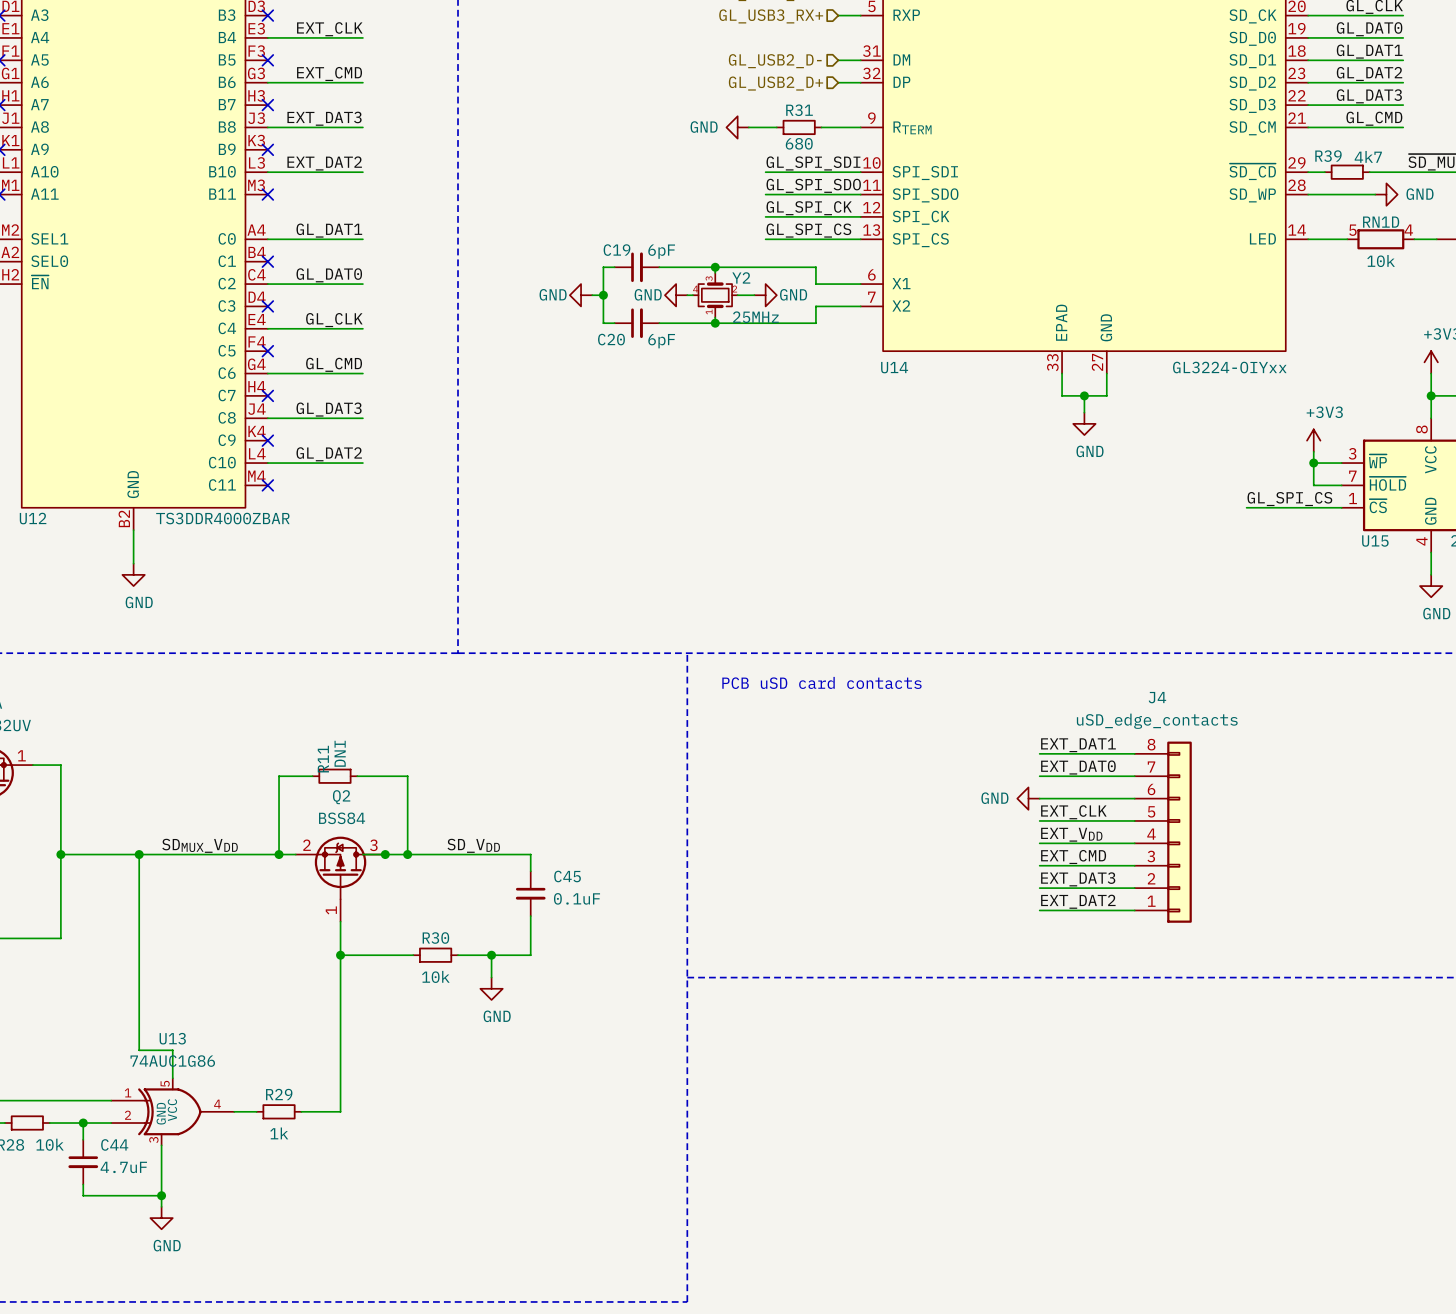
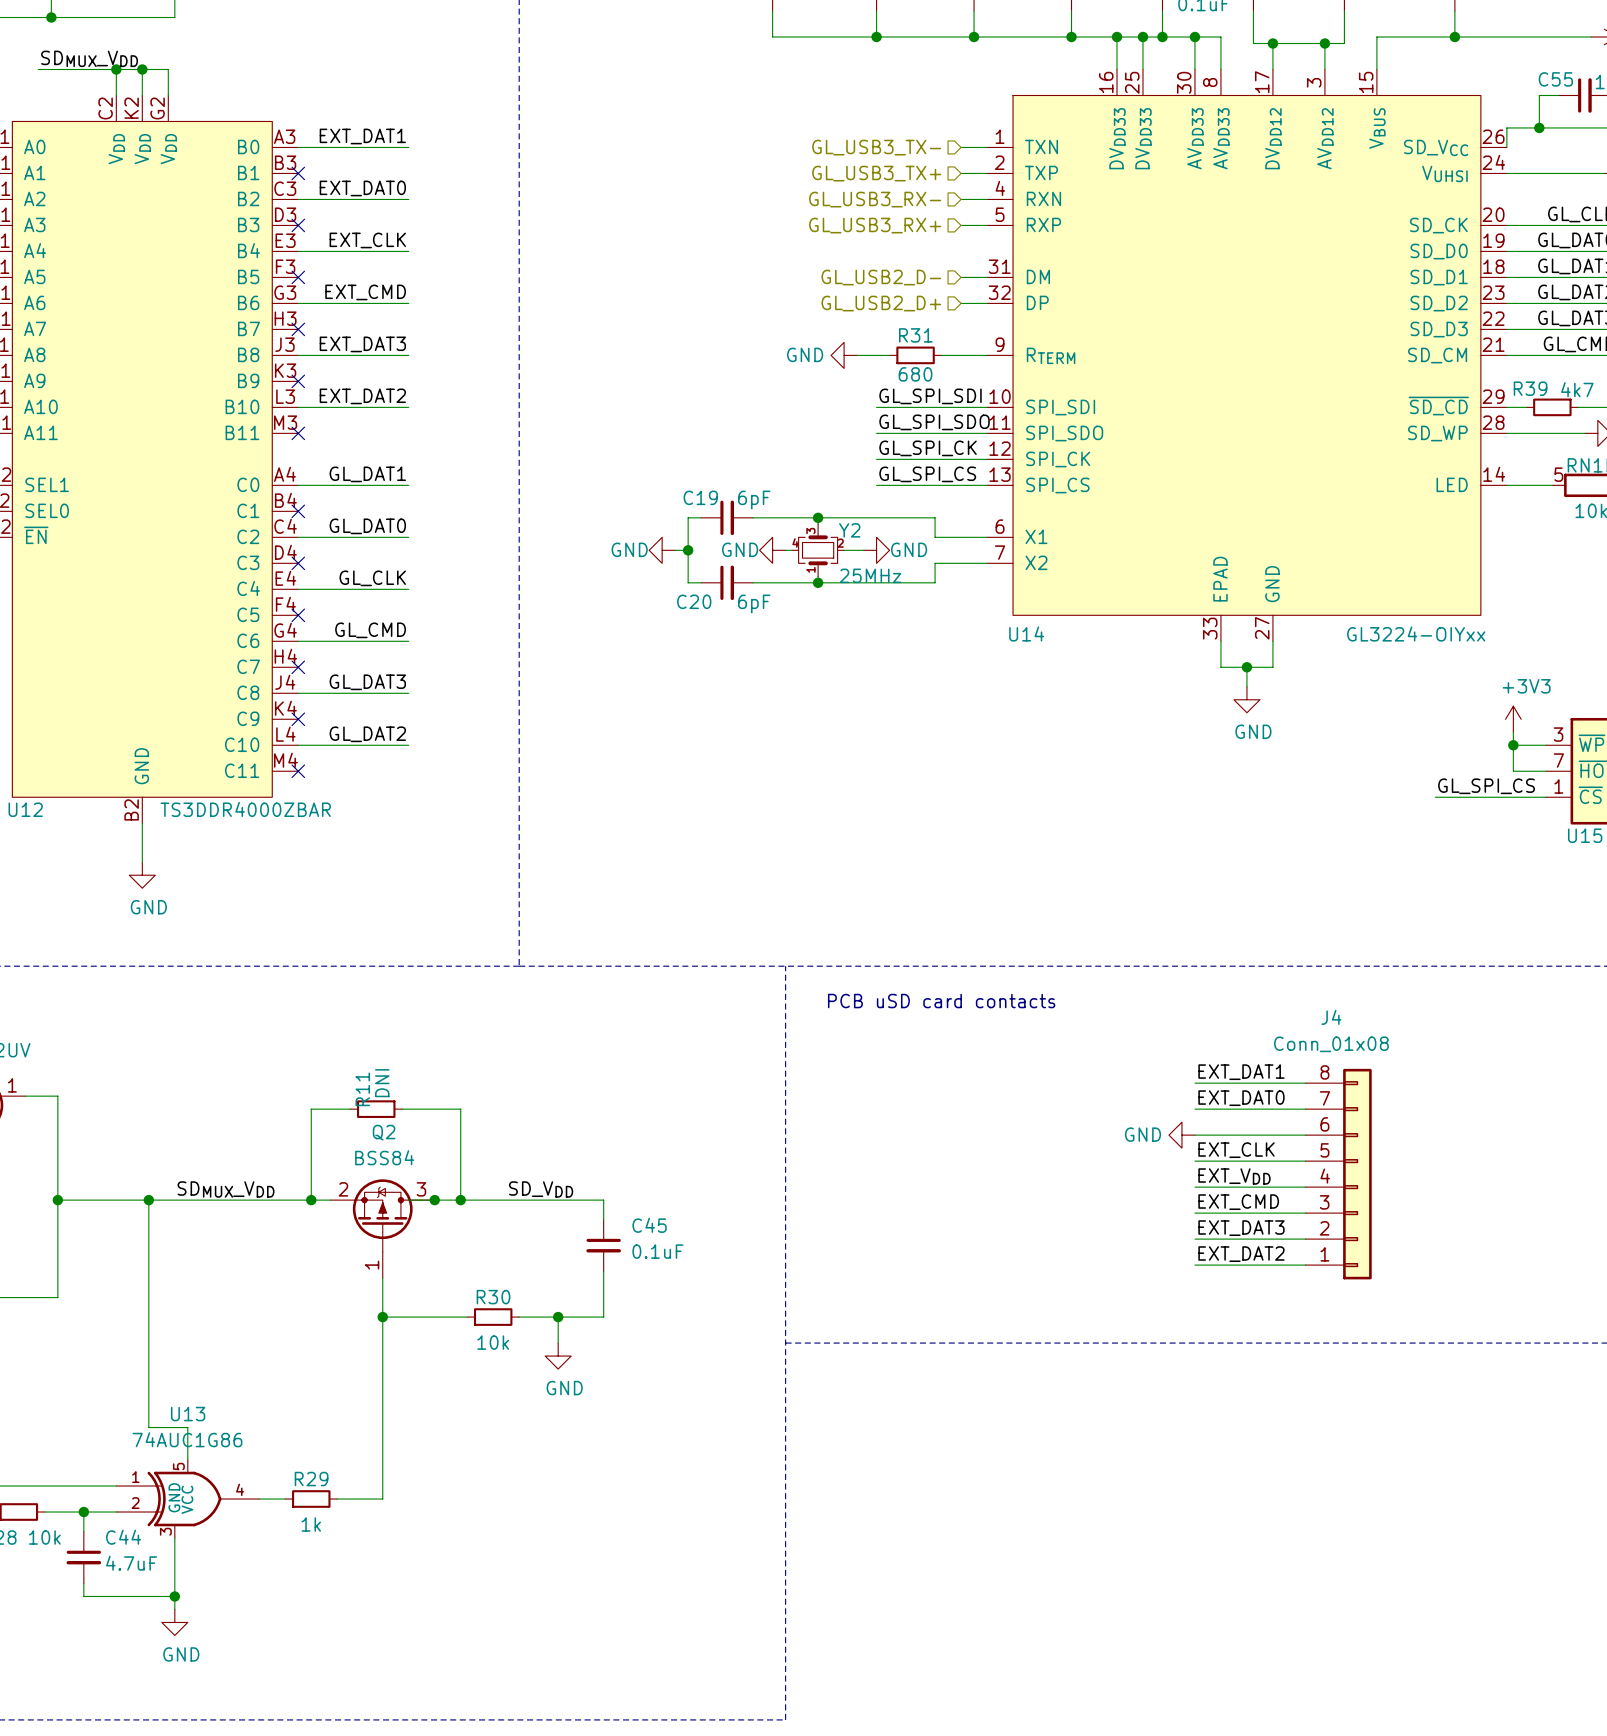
J4 value: uSD_edge_contacts (1157, 721) -> Conn_01x08 (1331, 1044)

